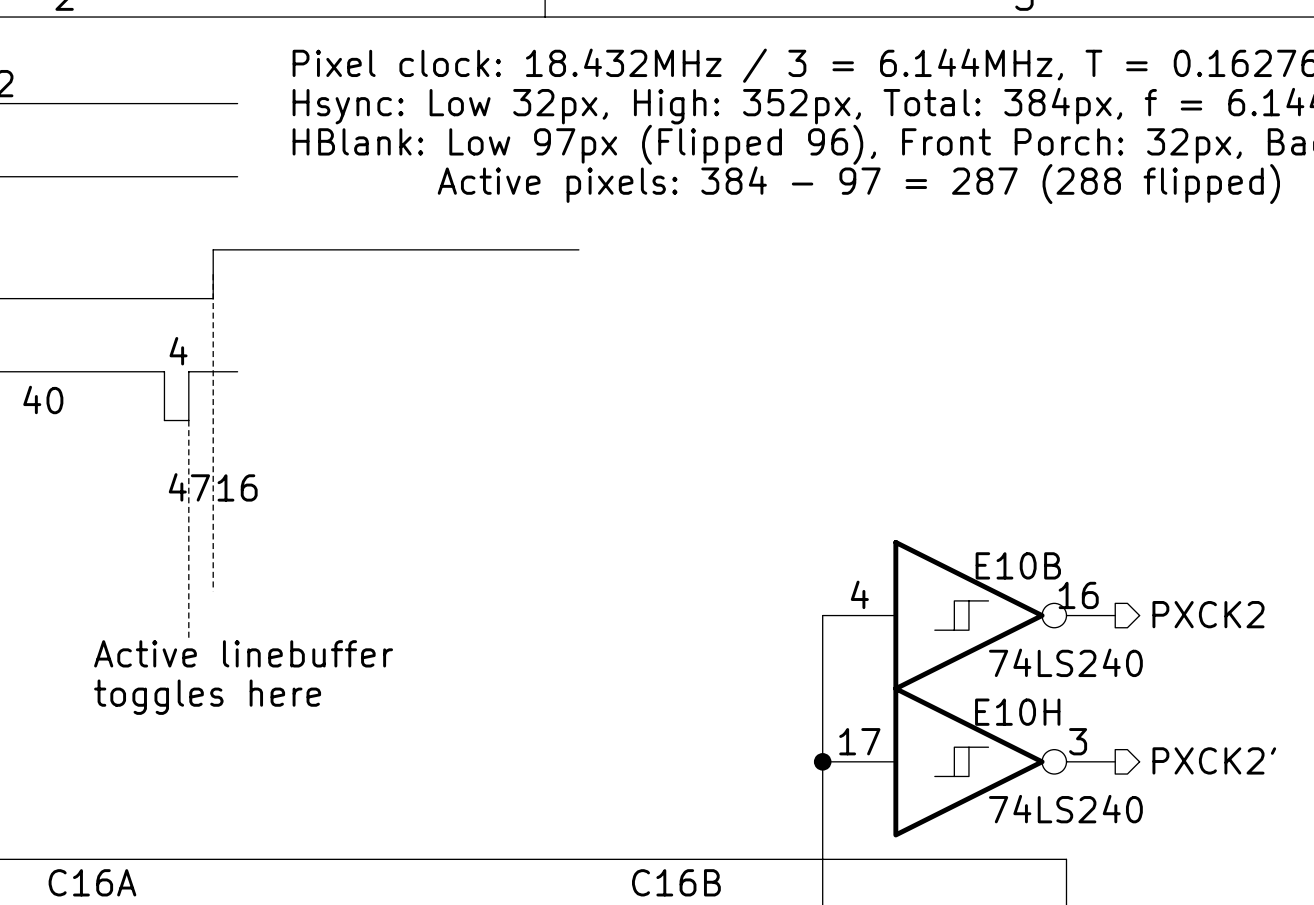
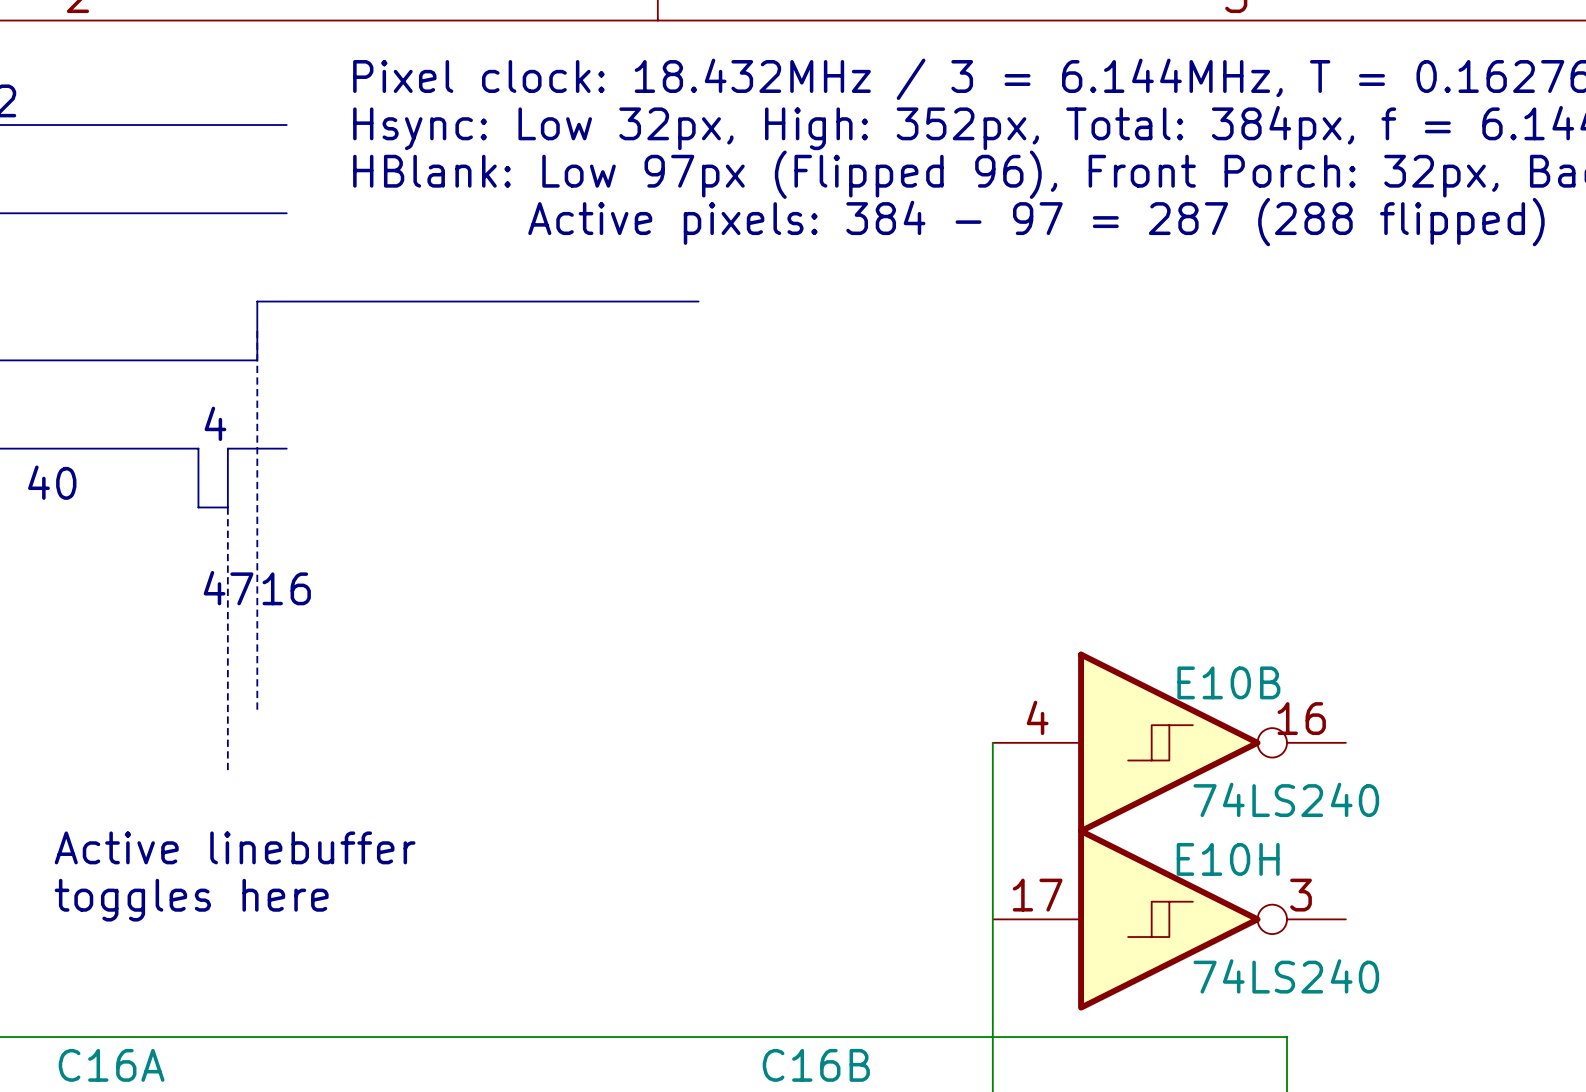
hierarchical label: PXCK2 (1208, 614) -> none
text position: Active linebuffer (243, 653) -> Active linebuffer (235, 847)
text position: toggles here (207, 697) -> toggles here (191, 900)
hierarchical label: PXCK2' (1214, 760) -> none
junction: (822, 761) -> none

